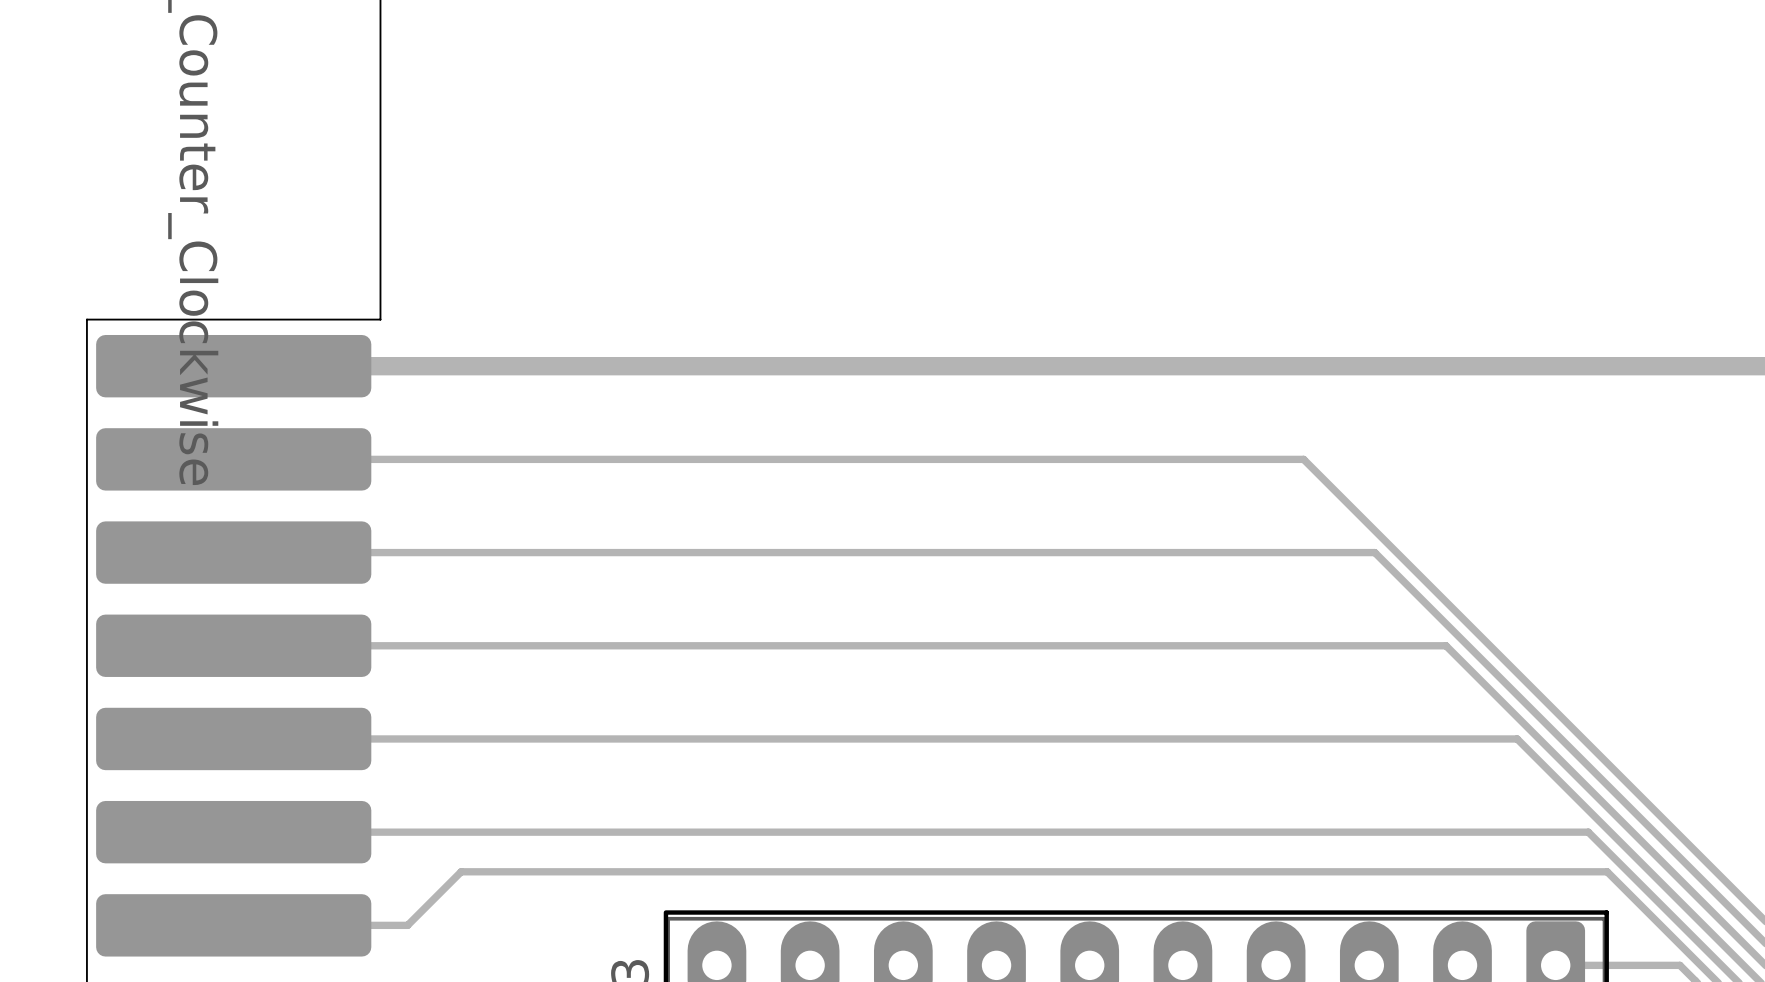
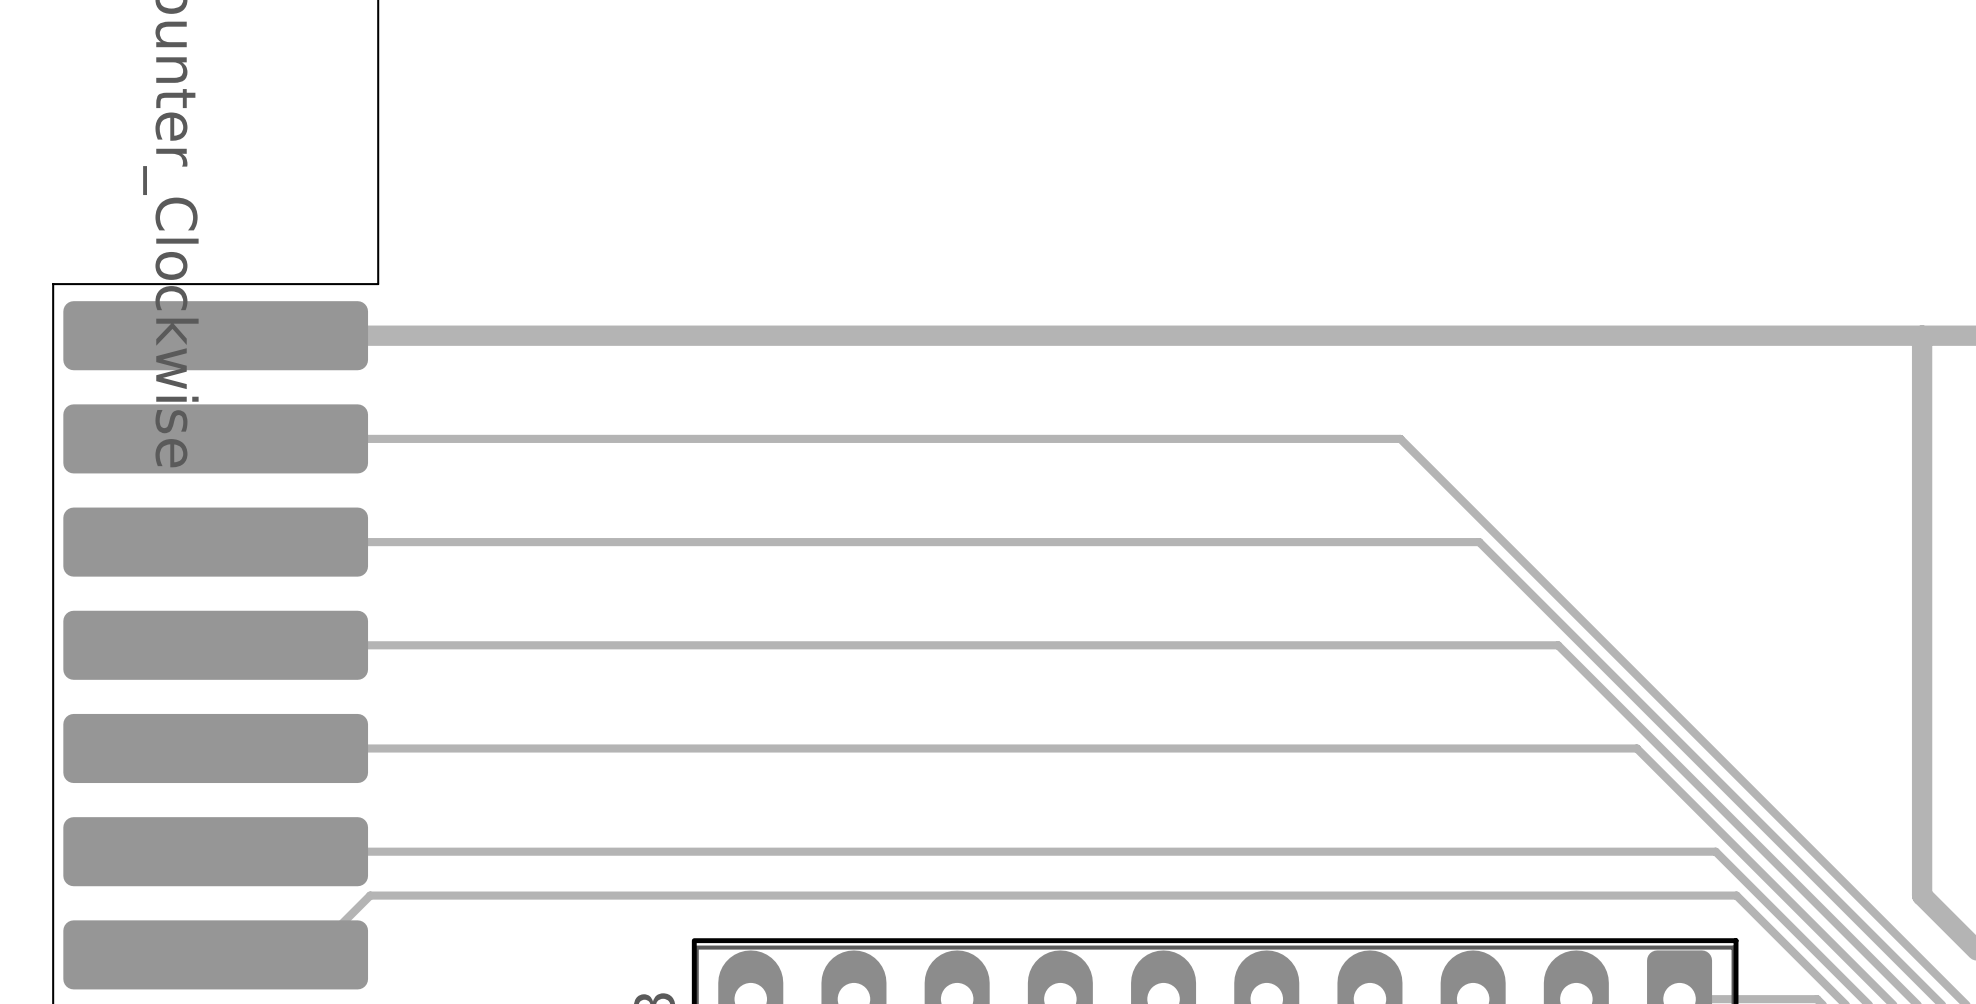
track: (461, 871) (407, 925) (319, 925) -> (467, 895) (370, 895) (310, 954)

